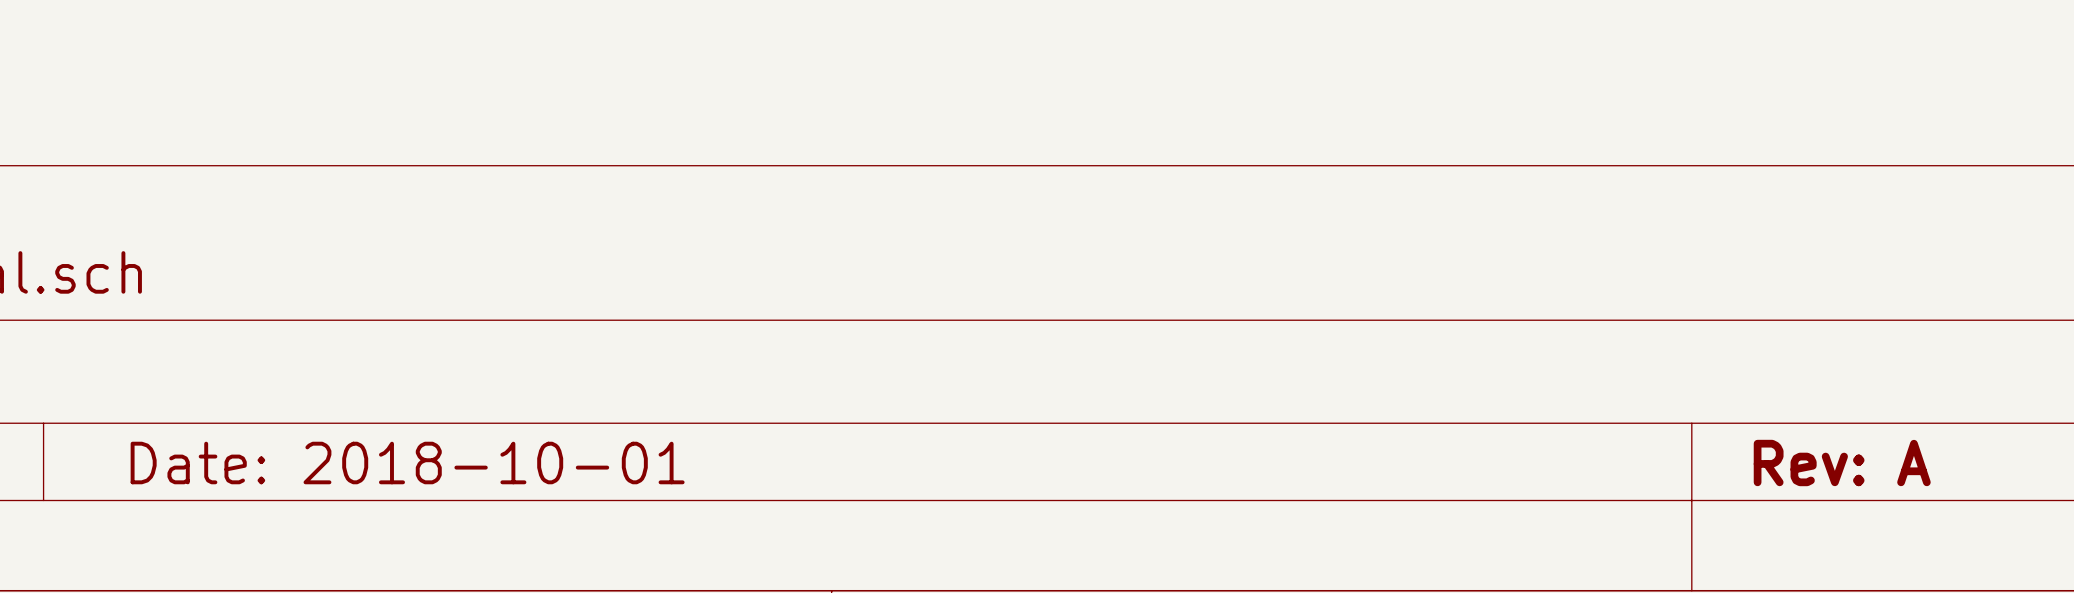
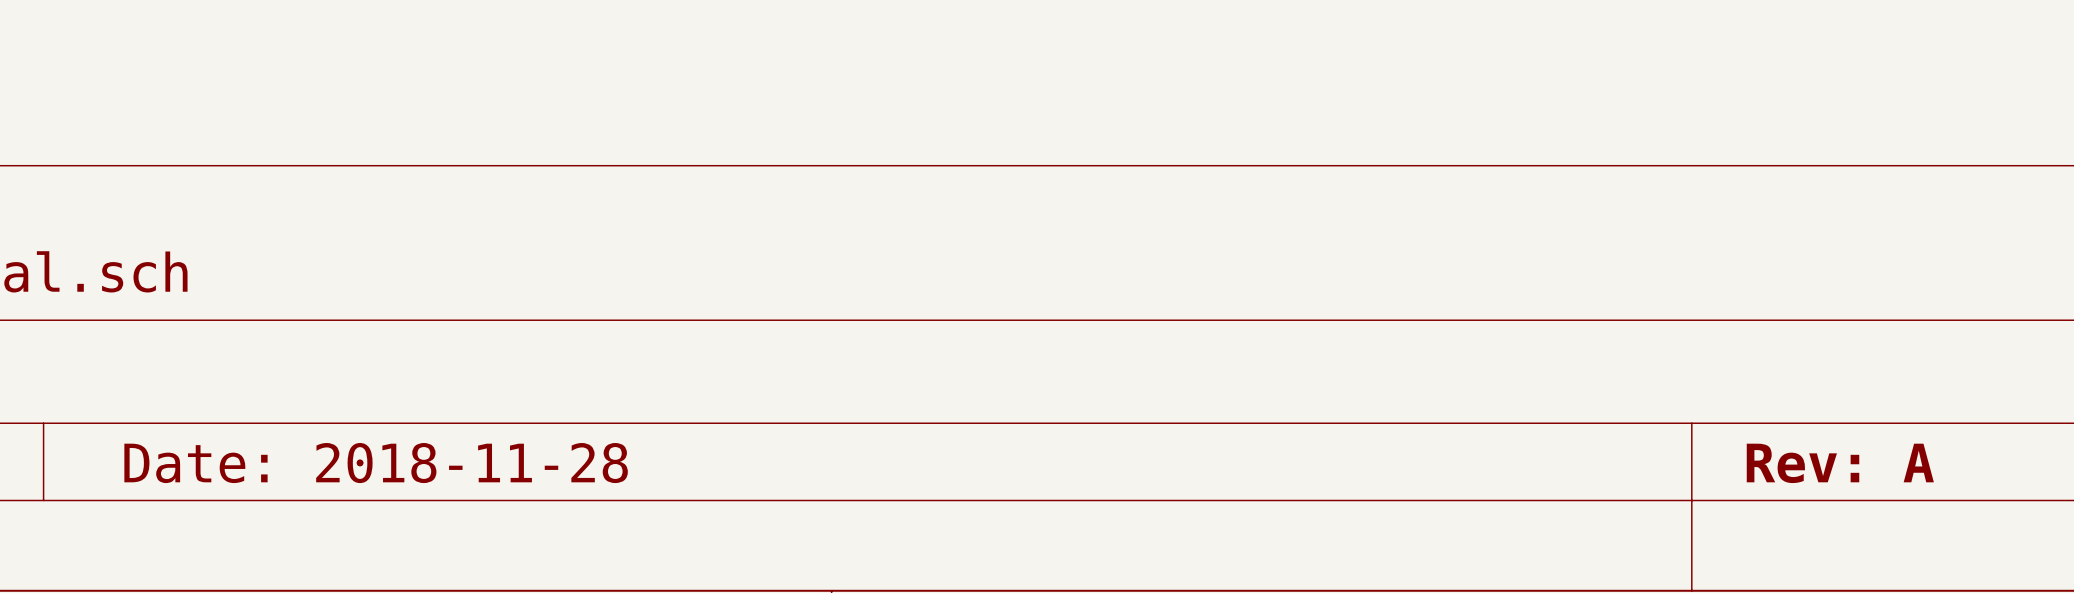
title block: Date: 2018-10-01 (407, 463) -> Date: 2018-11-28 (376, 463)

